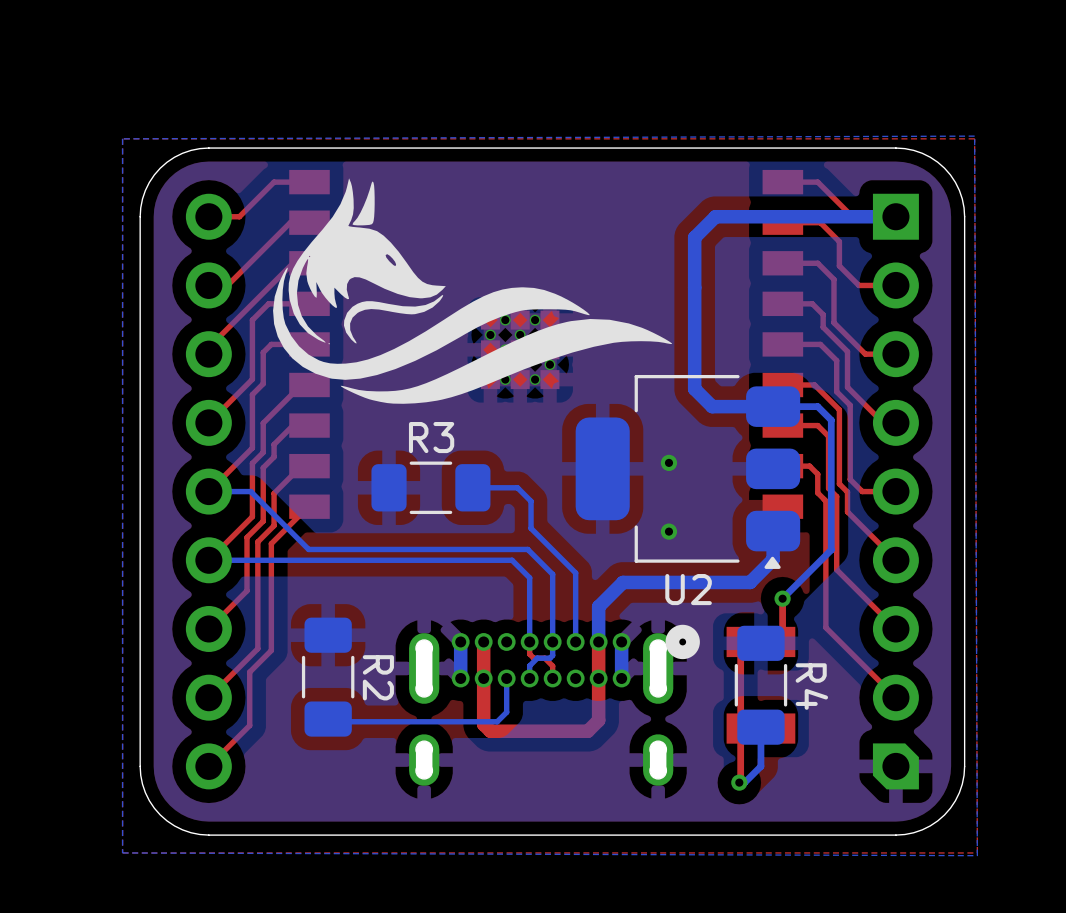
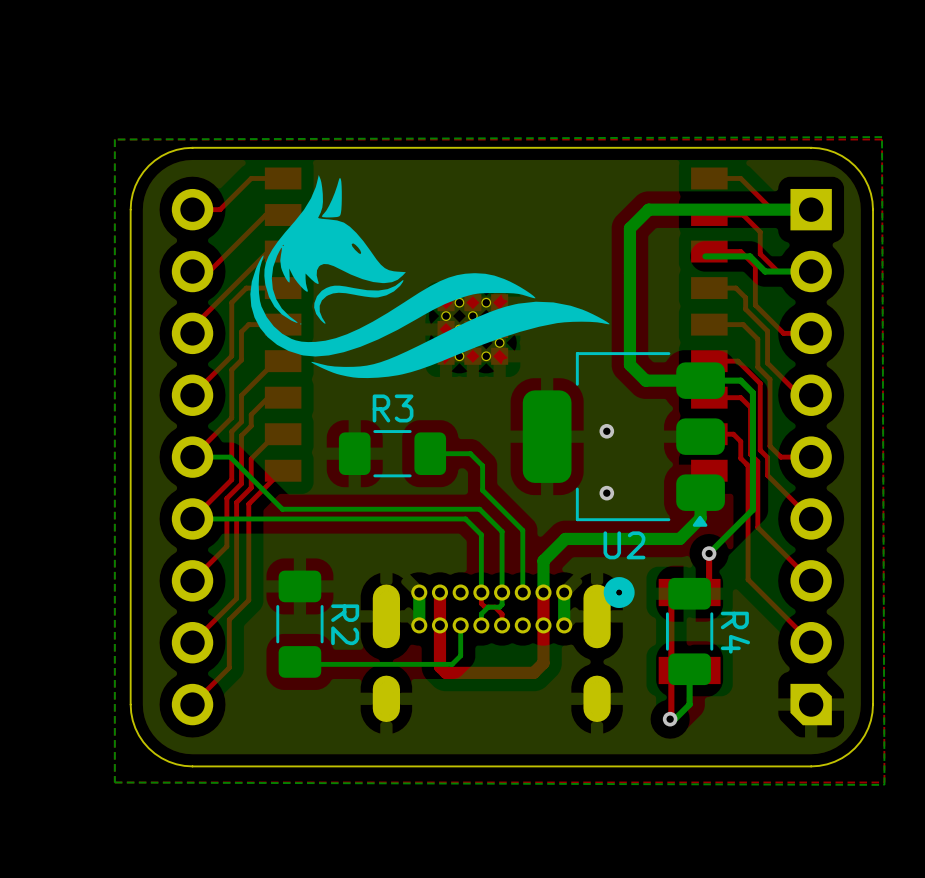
bottom track: none -> (705, 256) (750, 256) (765, 271) (811, 271)

